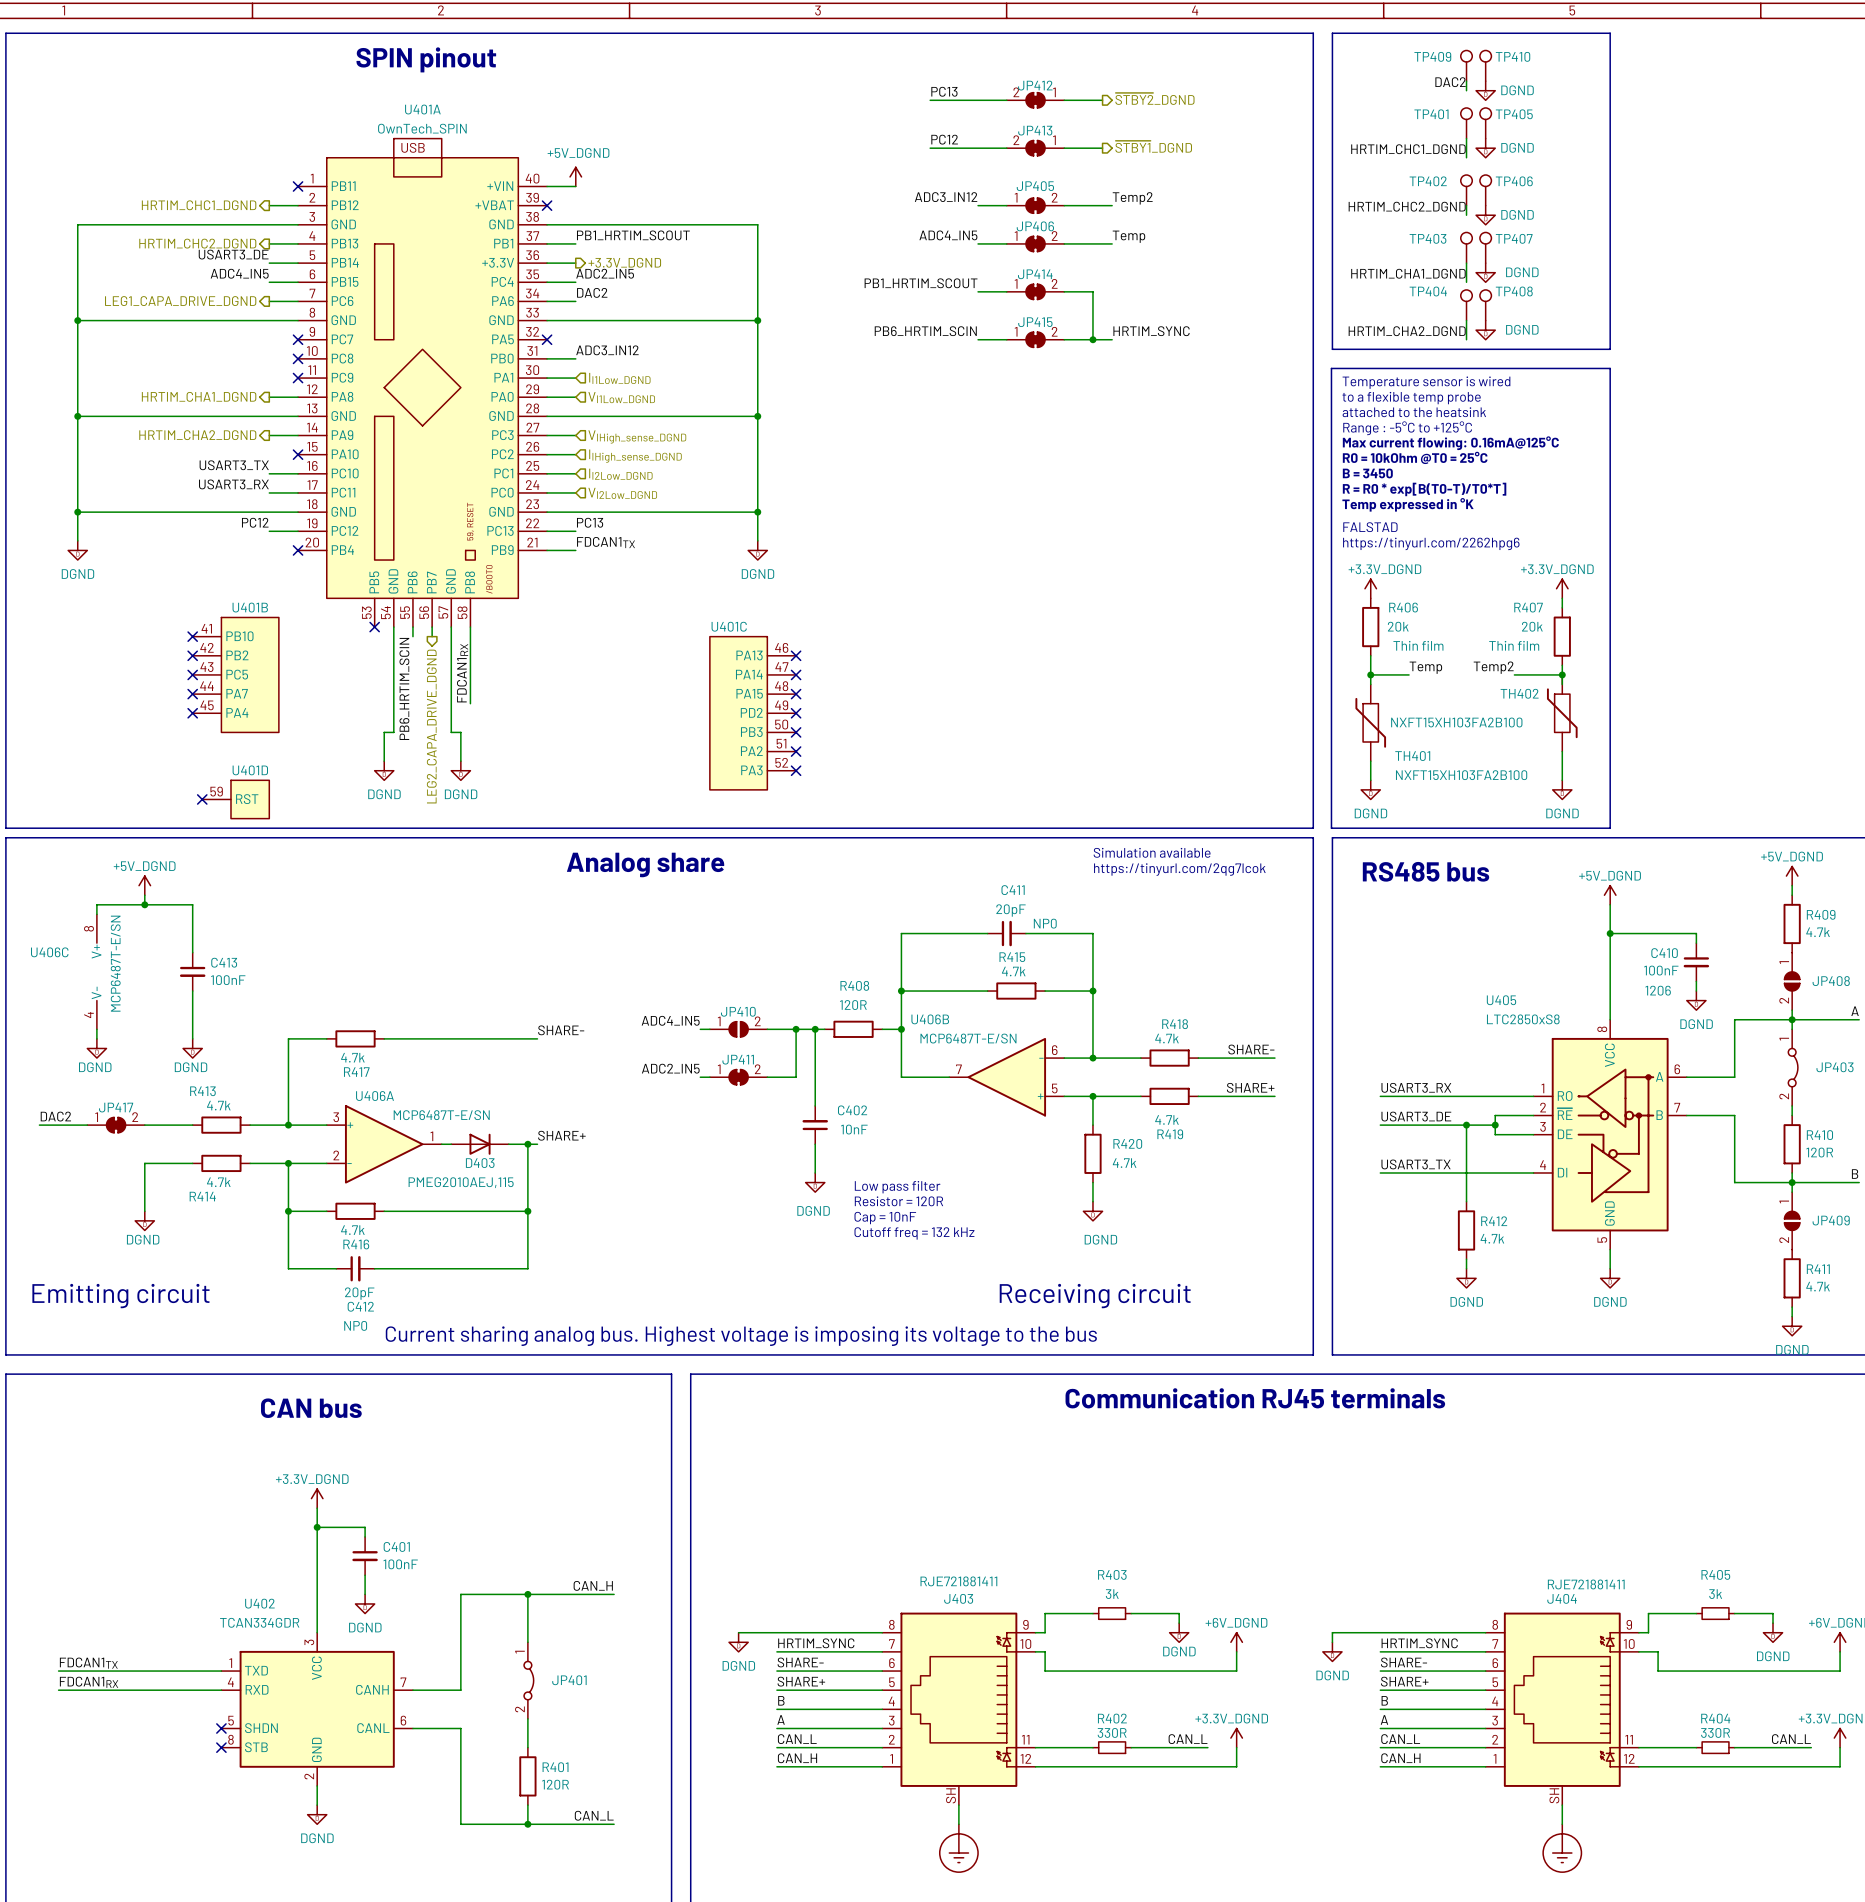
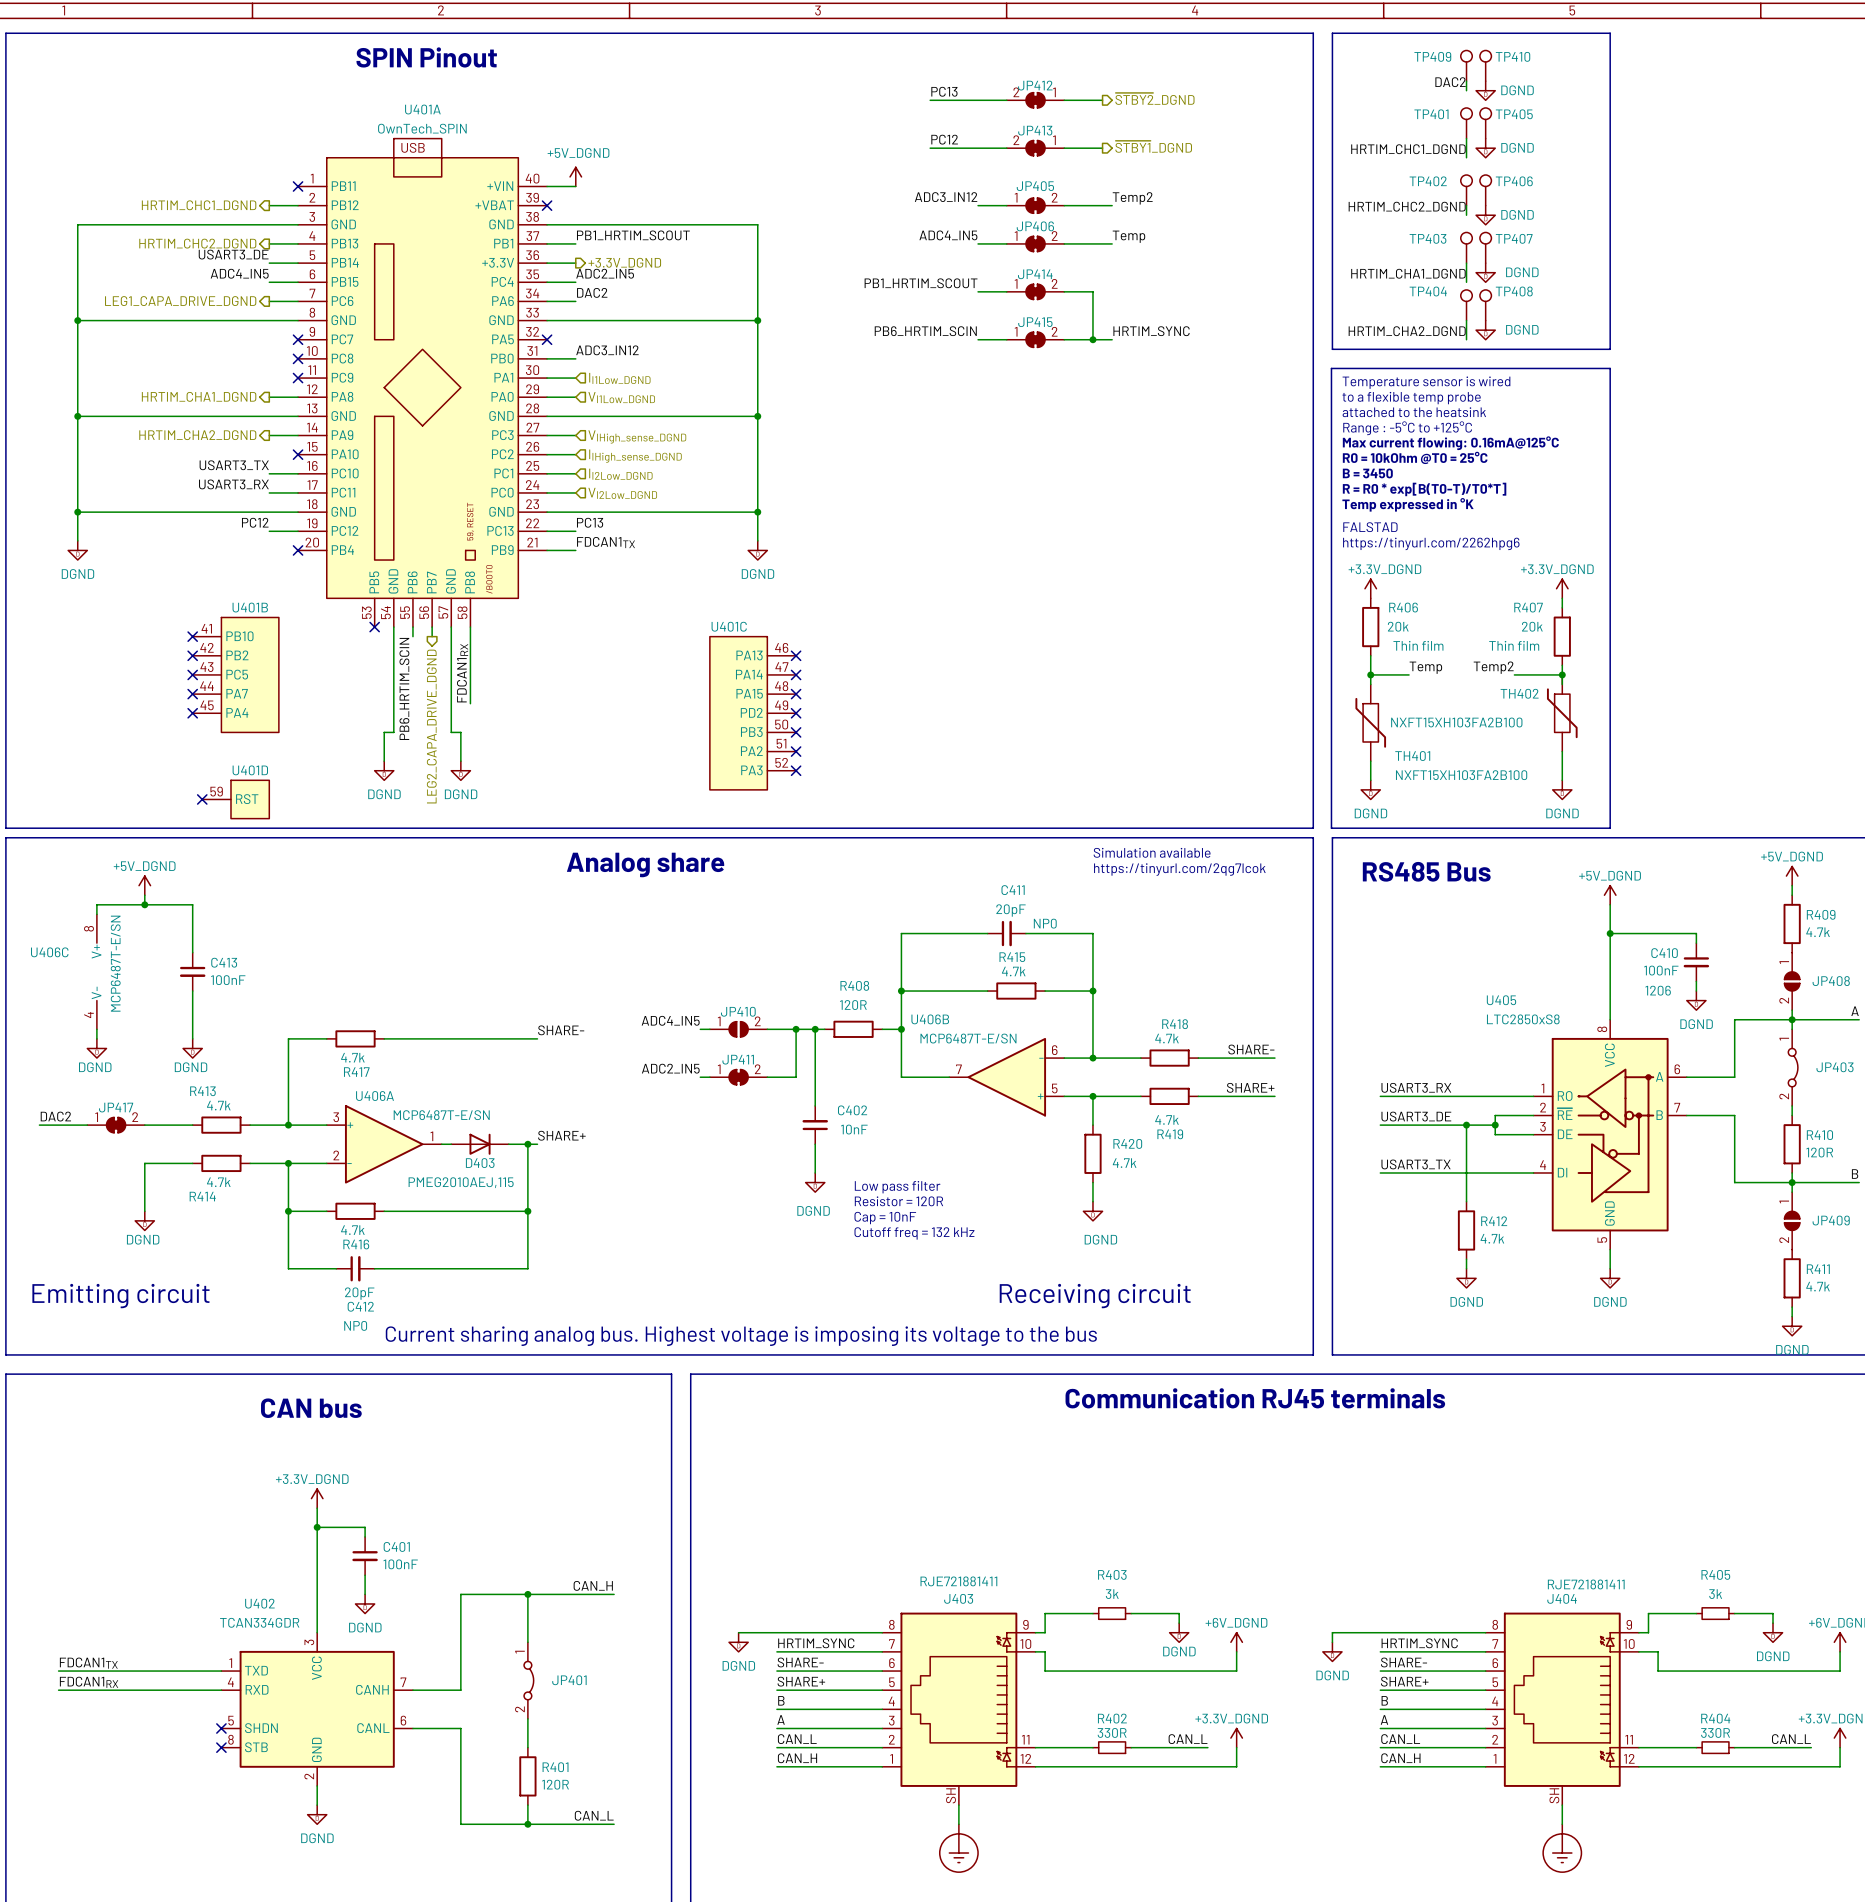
text: SPIN pinout (426, 59) -> SPIN Pinout (426, 57)
text: RS485 bus (1426, 871) -> RS485 Bus (1426, 871)

